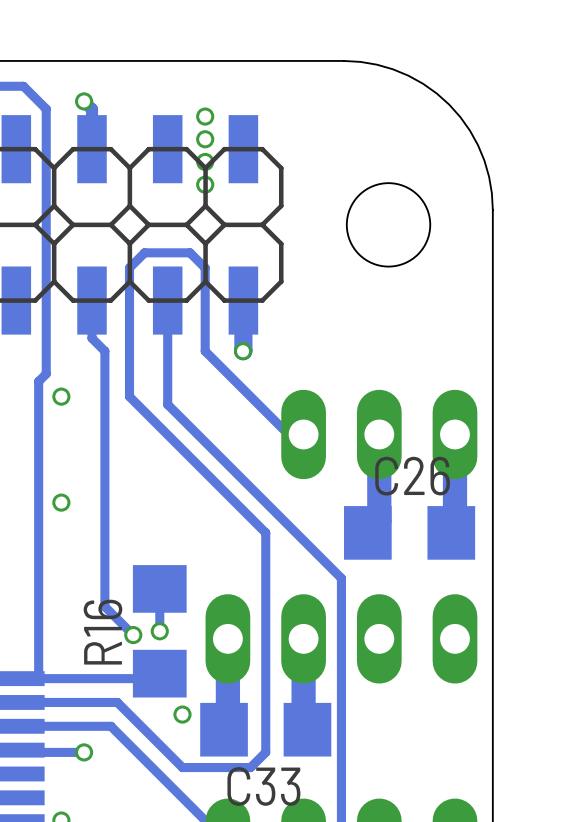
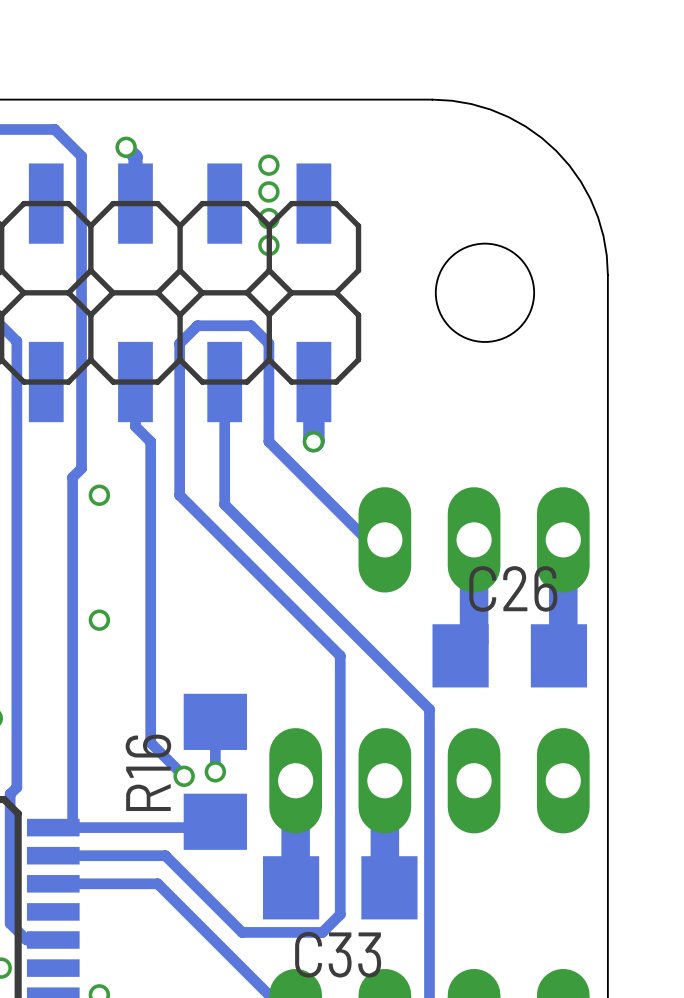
via: (182, 714) -> none
track: (22, 750) (23, 752) (84, 752) -> none
via: (84, 752) -> none

